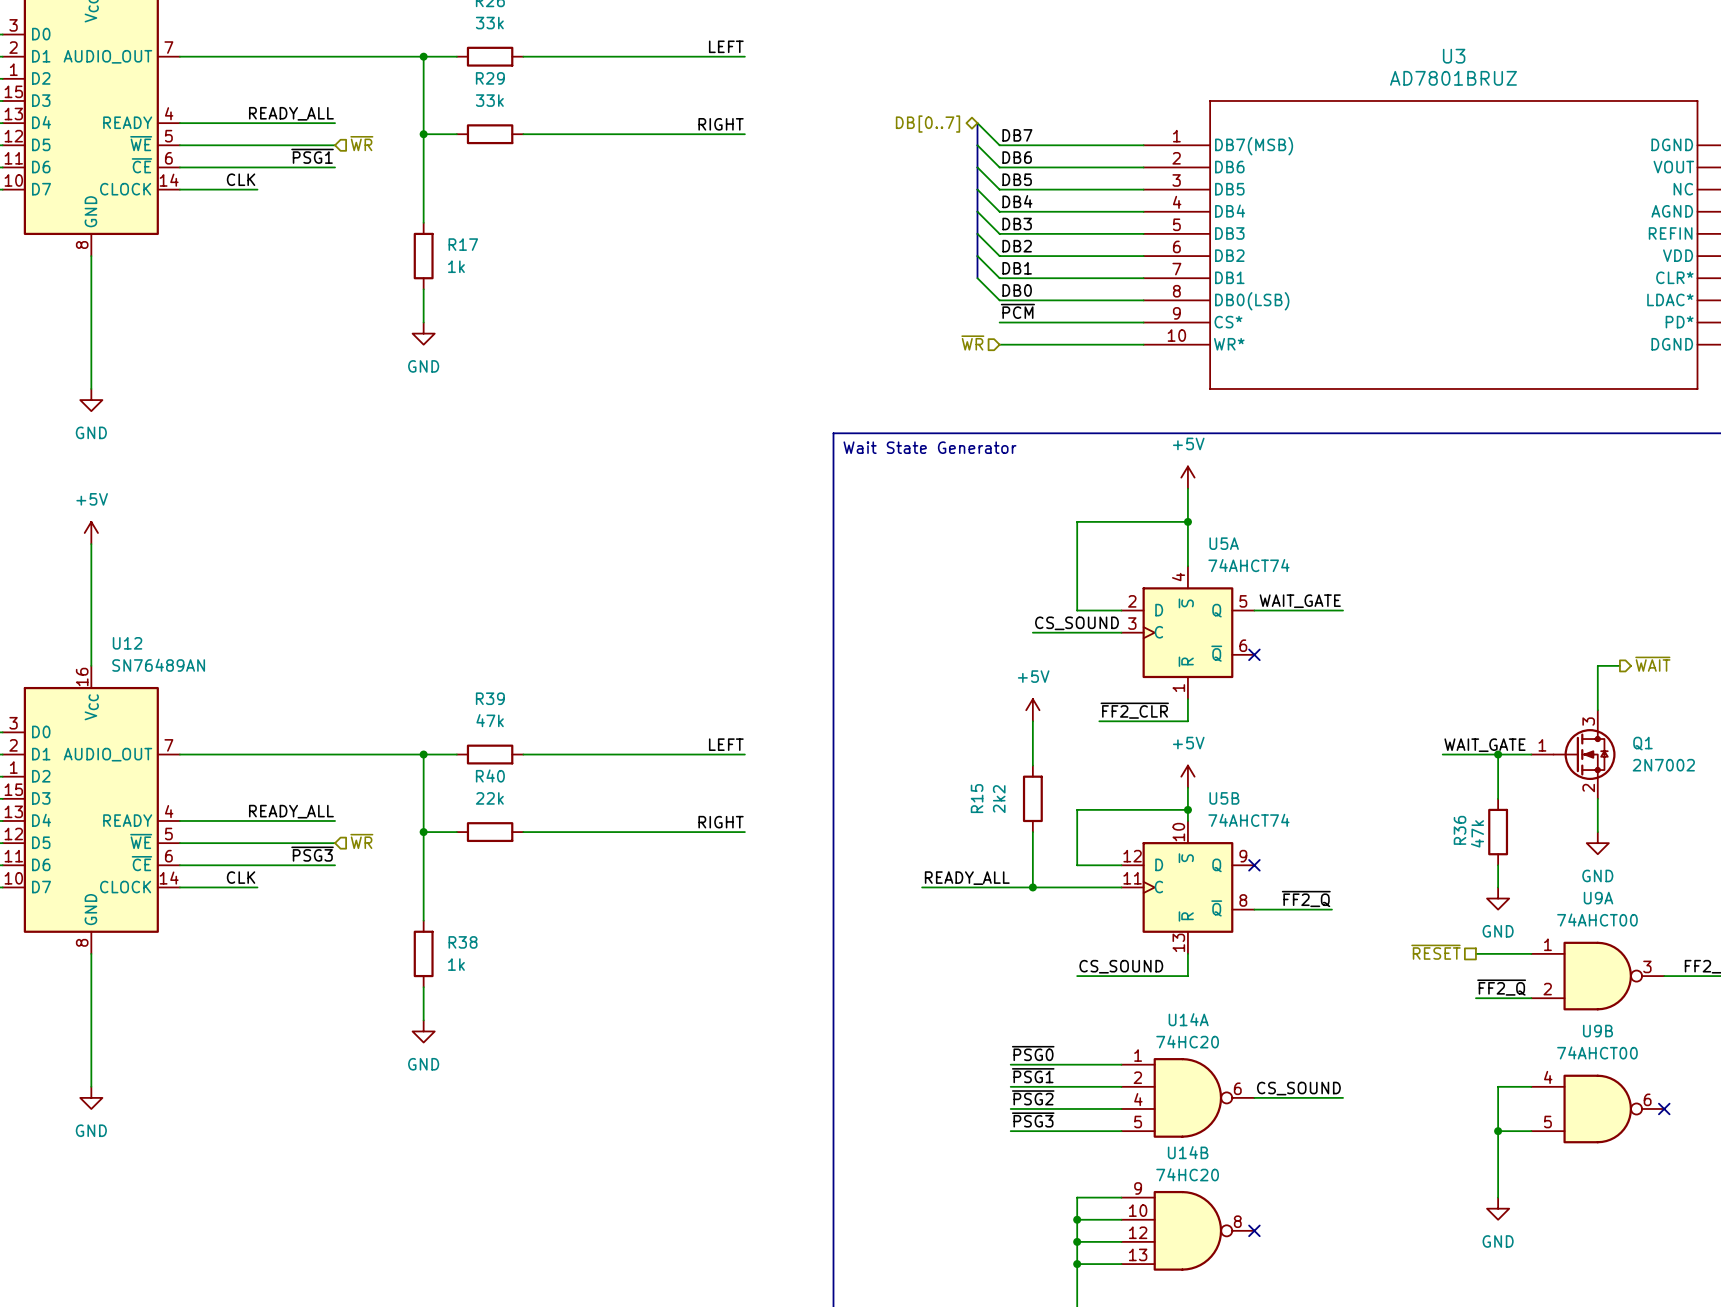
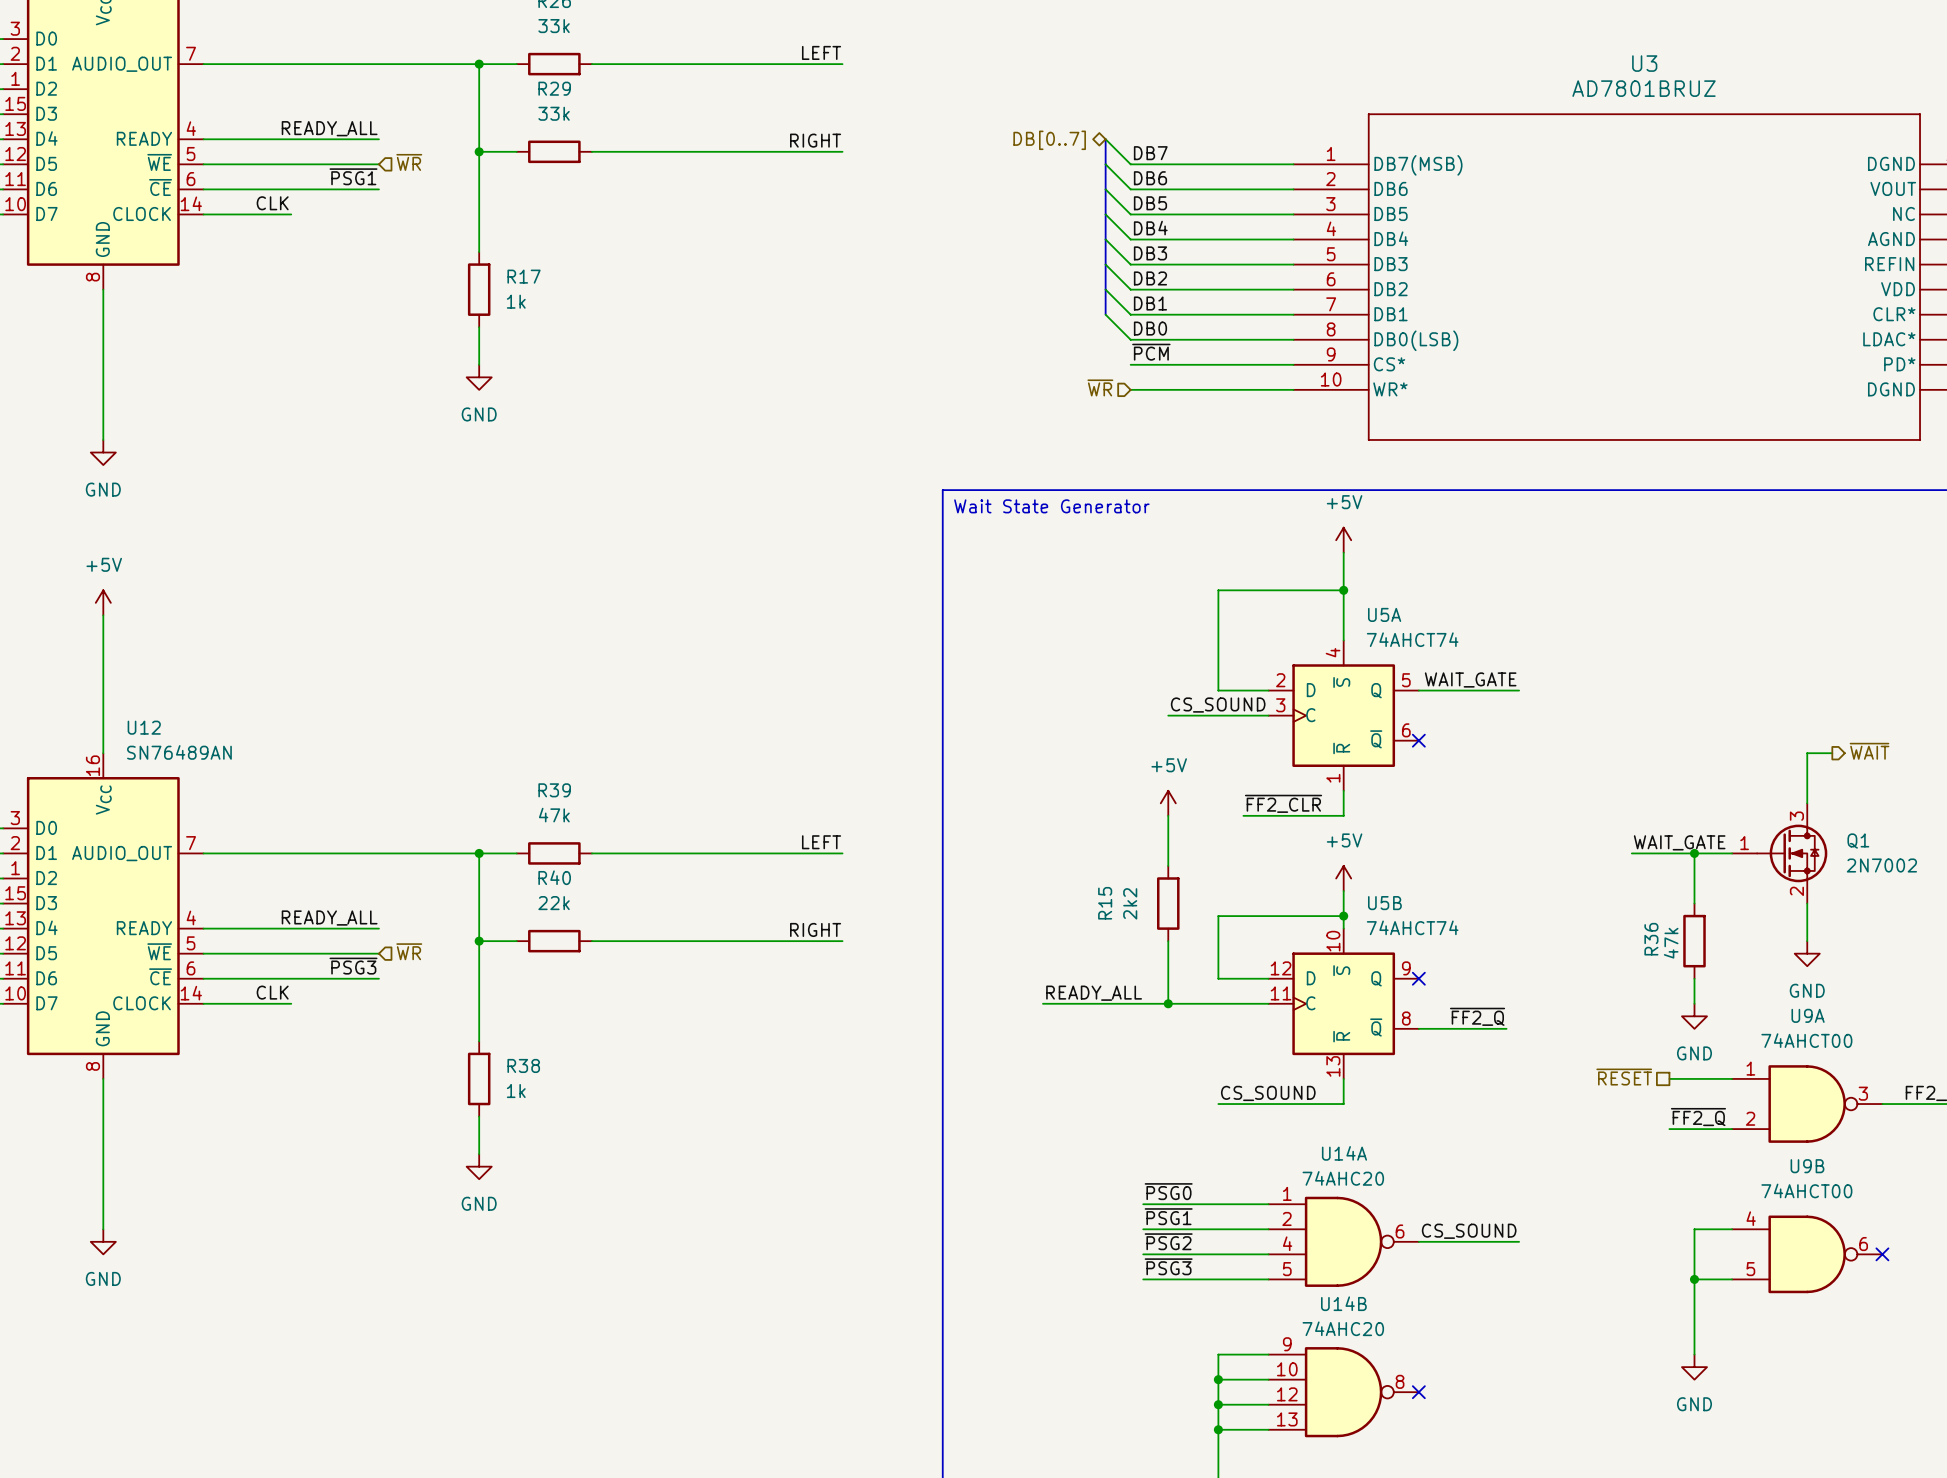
U14A value: 74HC20 (1187, 1041) -> 74AHC20 (1343, 1178)
U14B value: 74HC20 (1187, 1174) -> 74AHC20 (1343, 1328)

